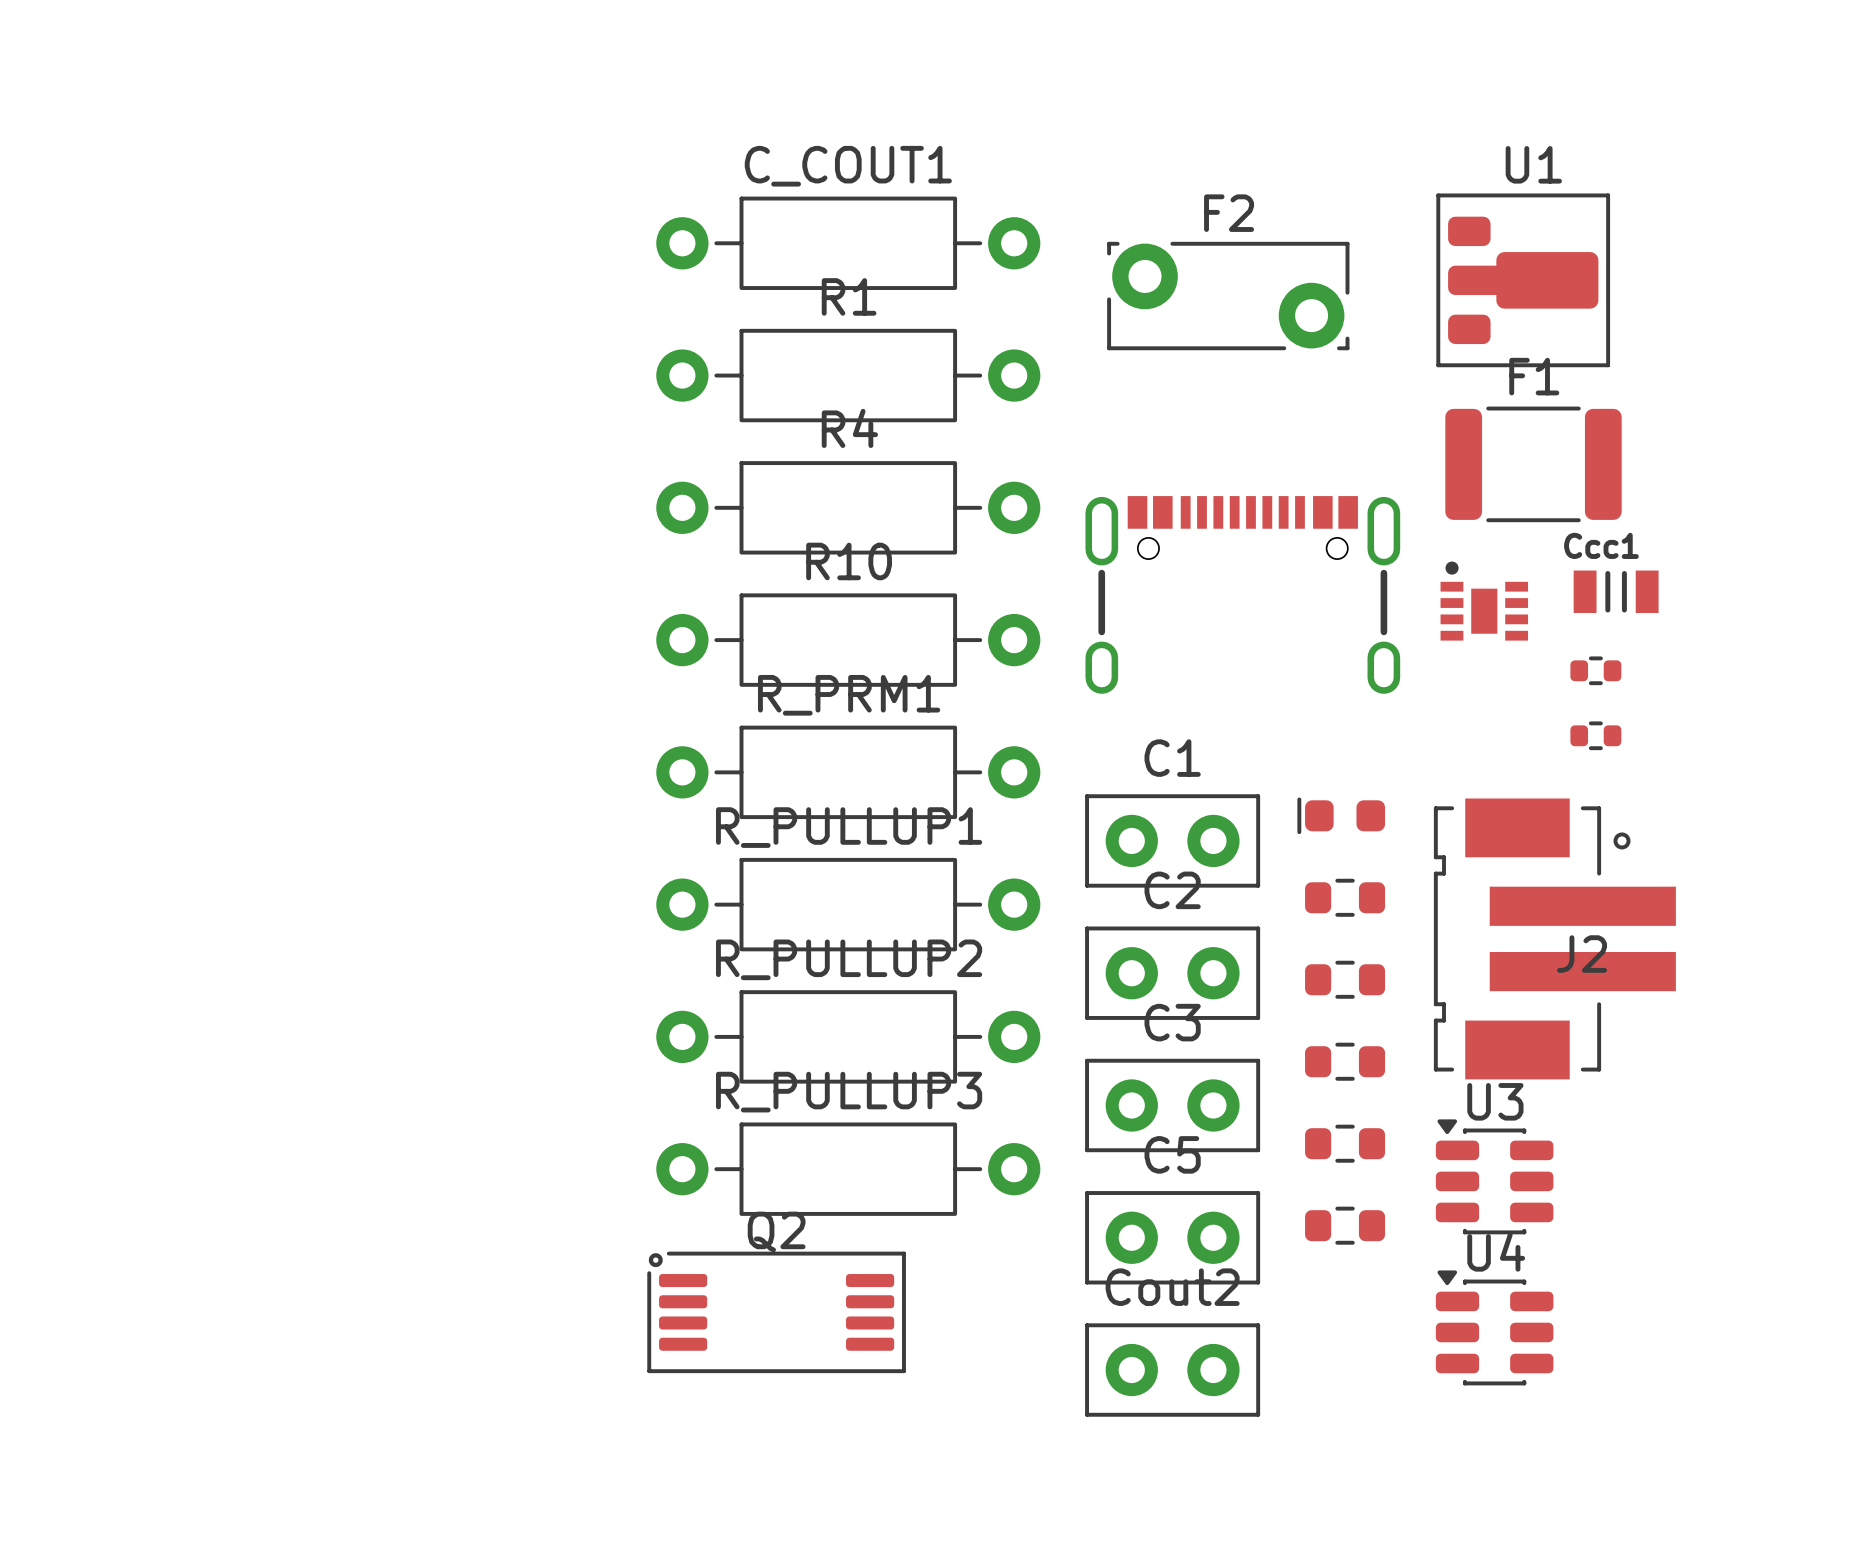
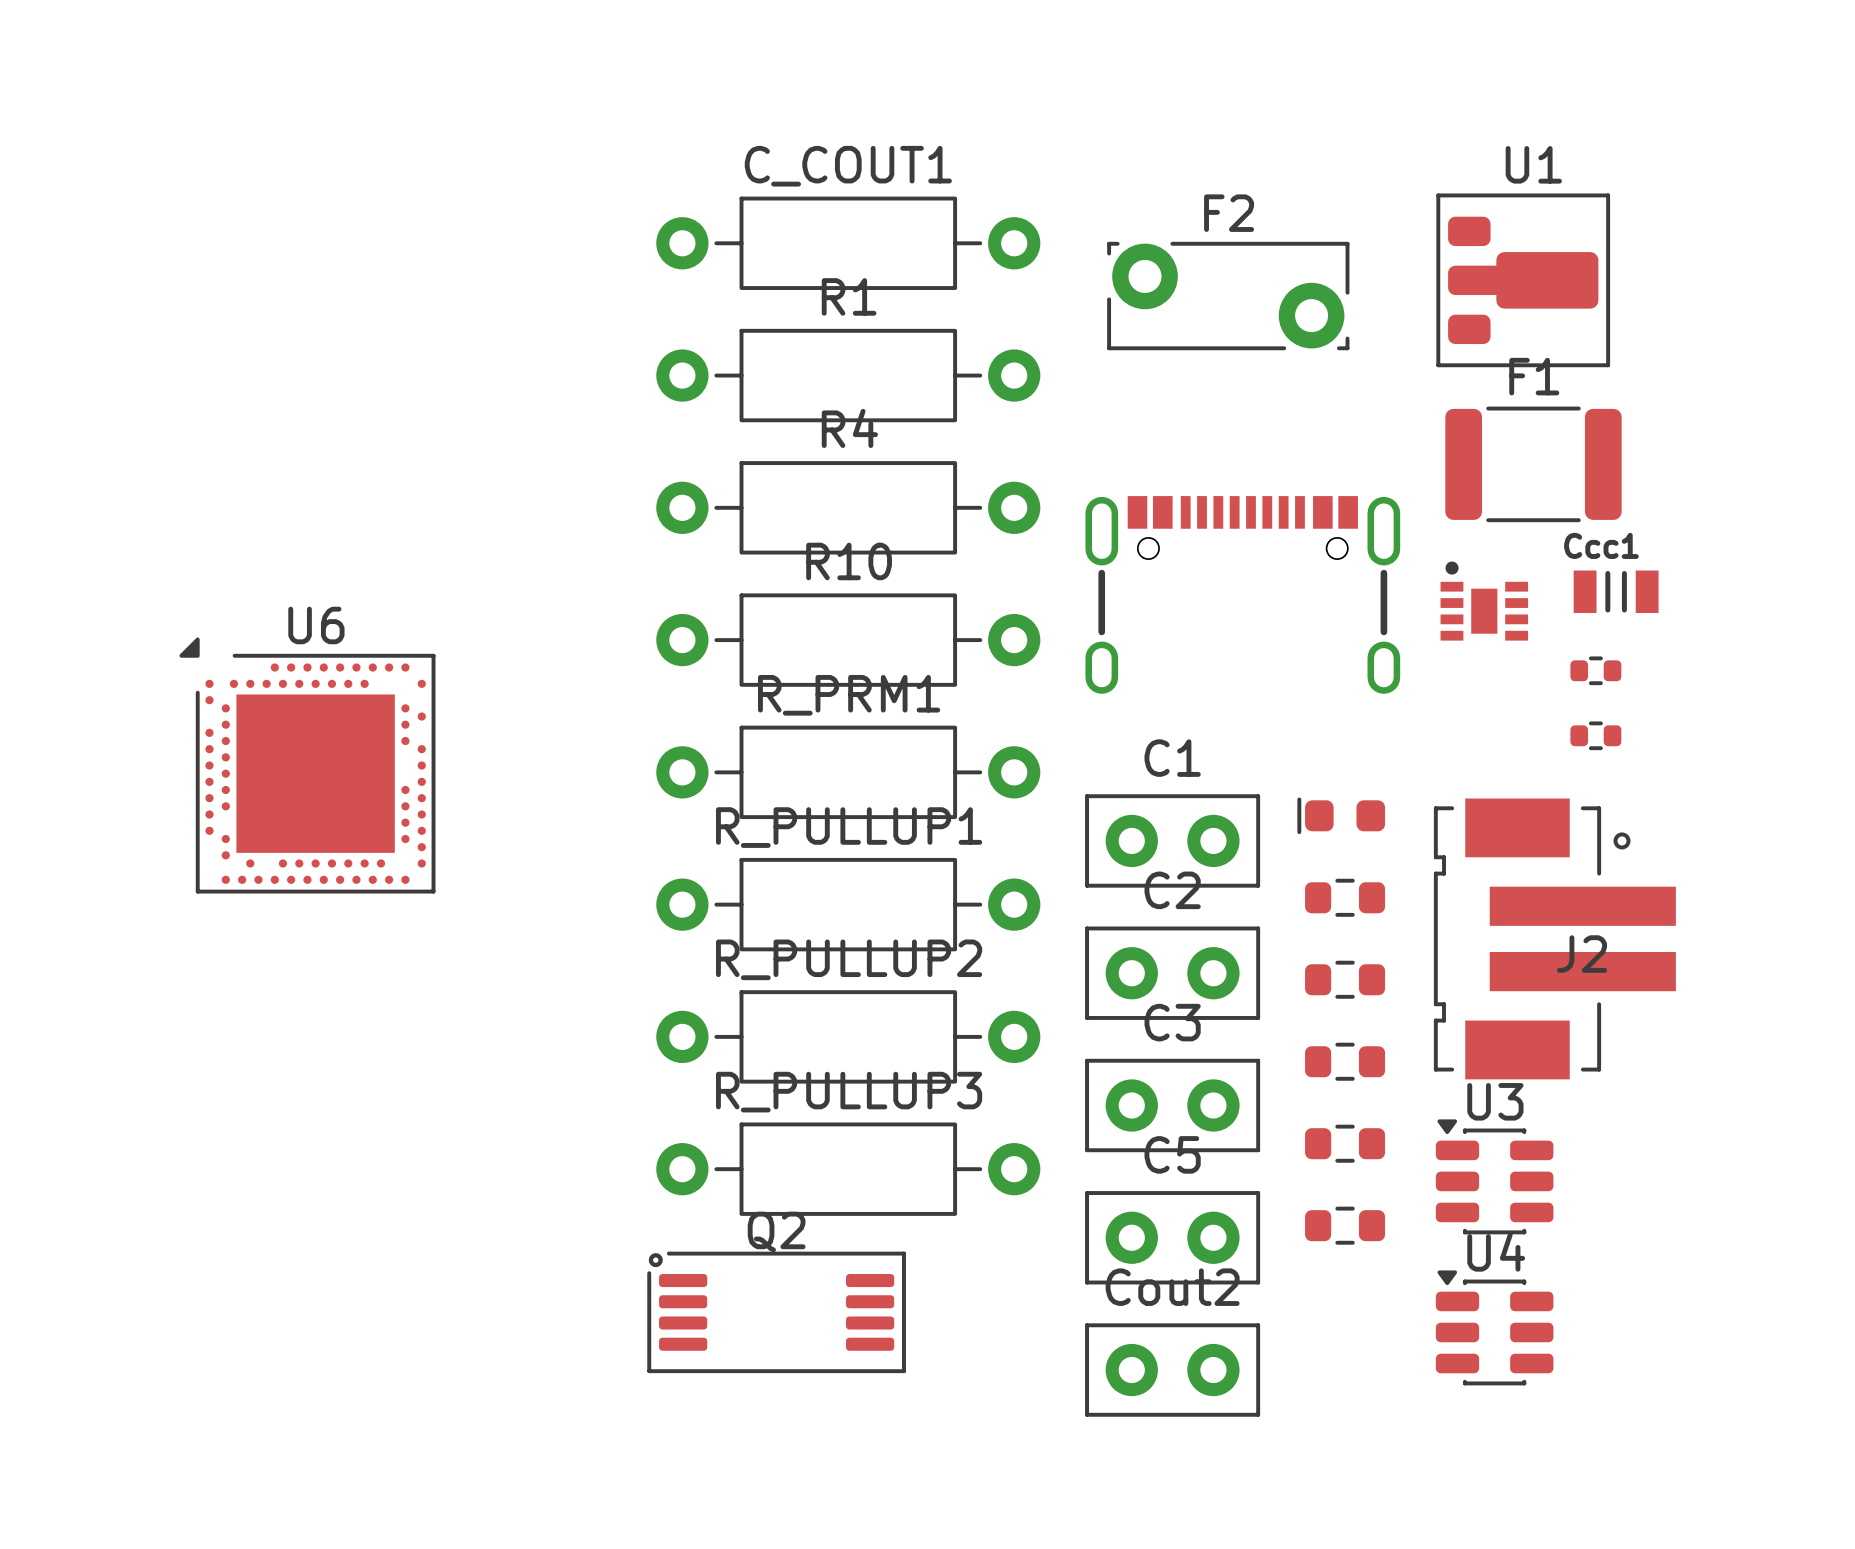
U6: none -> (307, 765)

